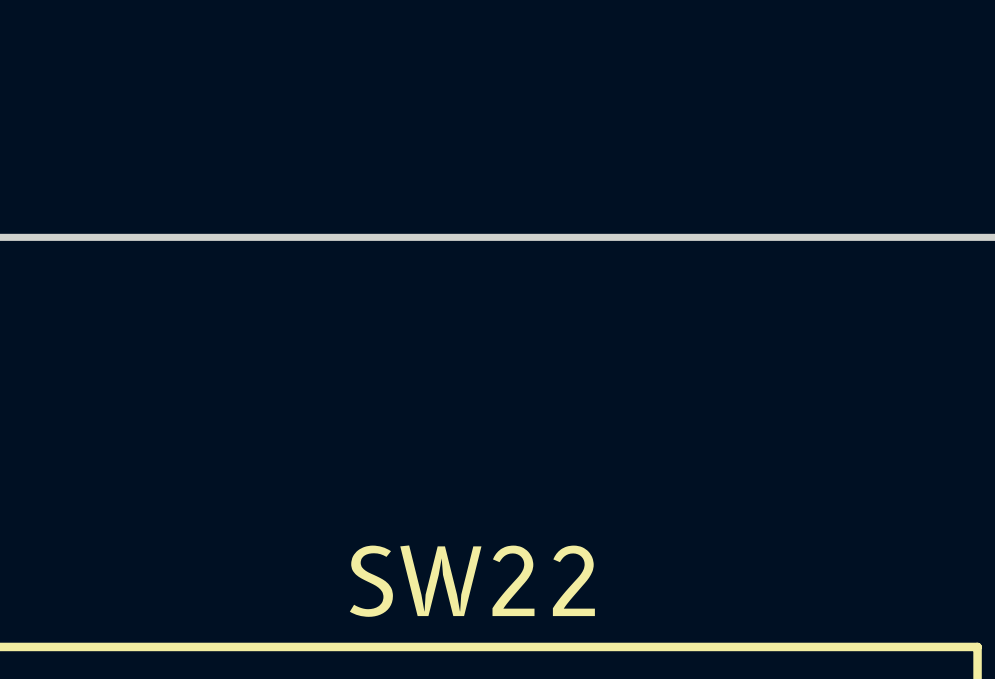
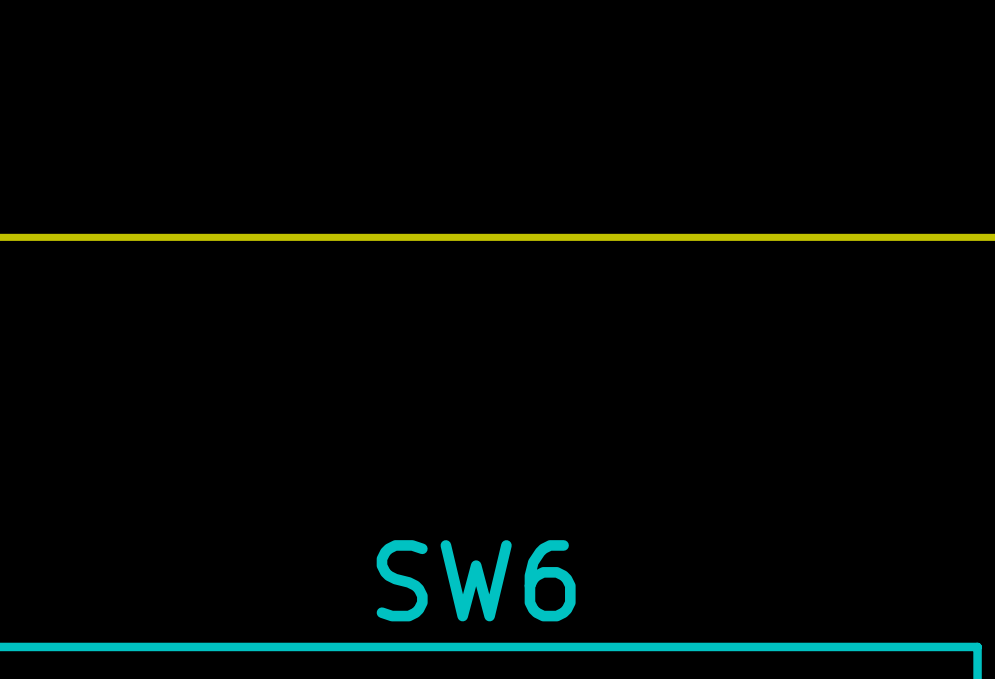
SW22 name: SW22 (472, 581) -> SW6 (476, 580)

